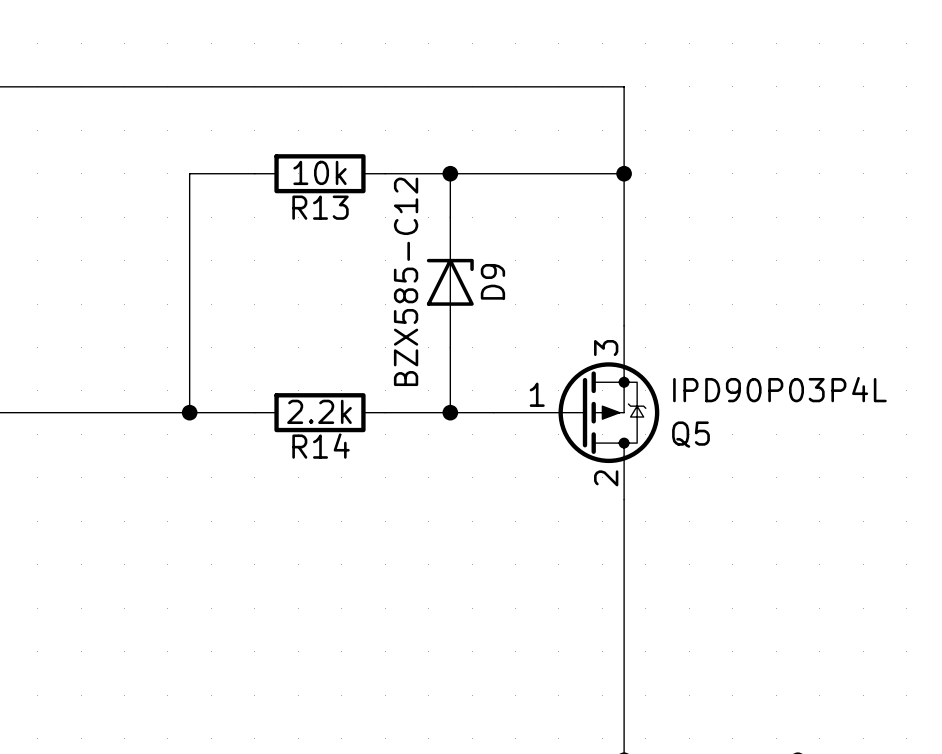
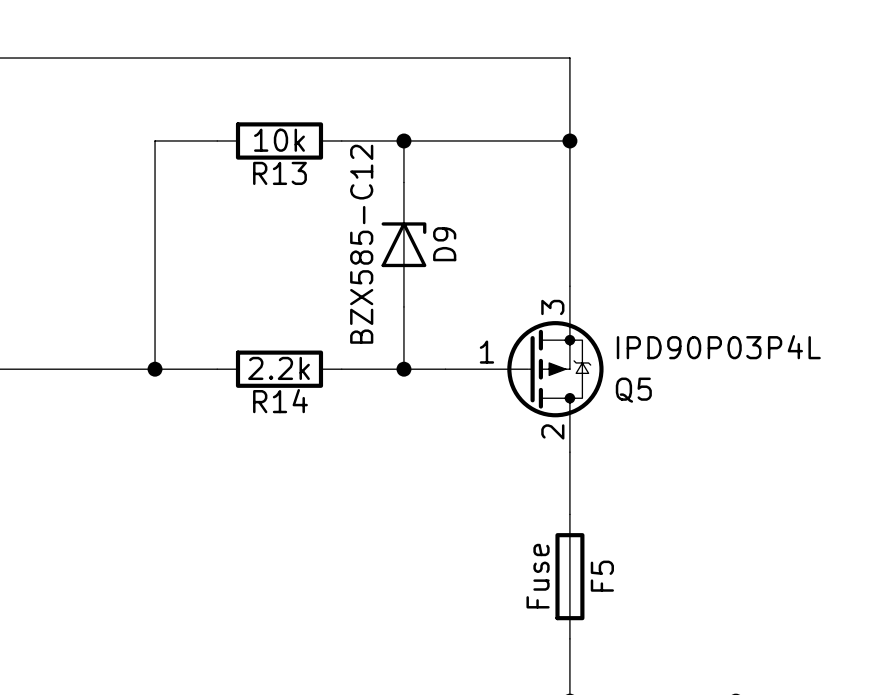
F5: none -> Fuse (569, 576)

